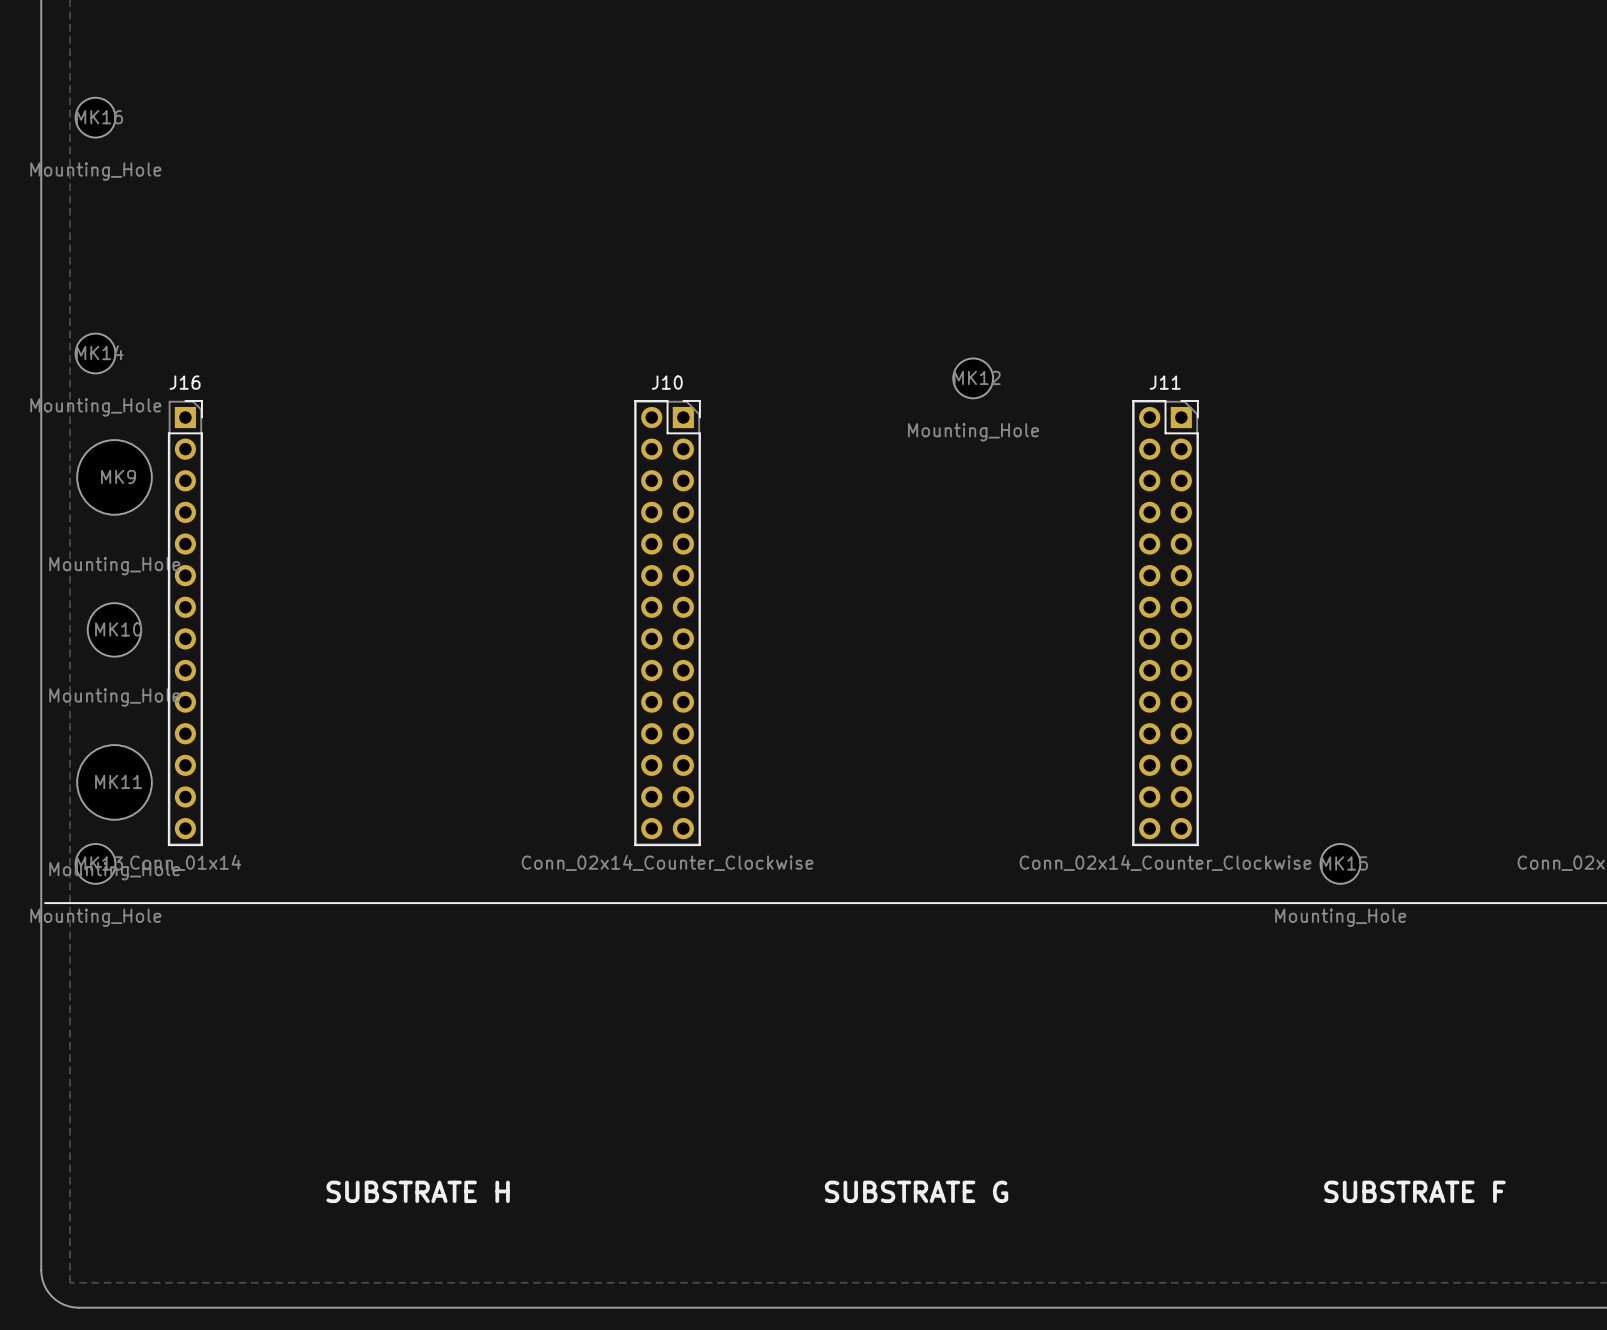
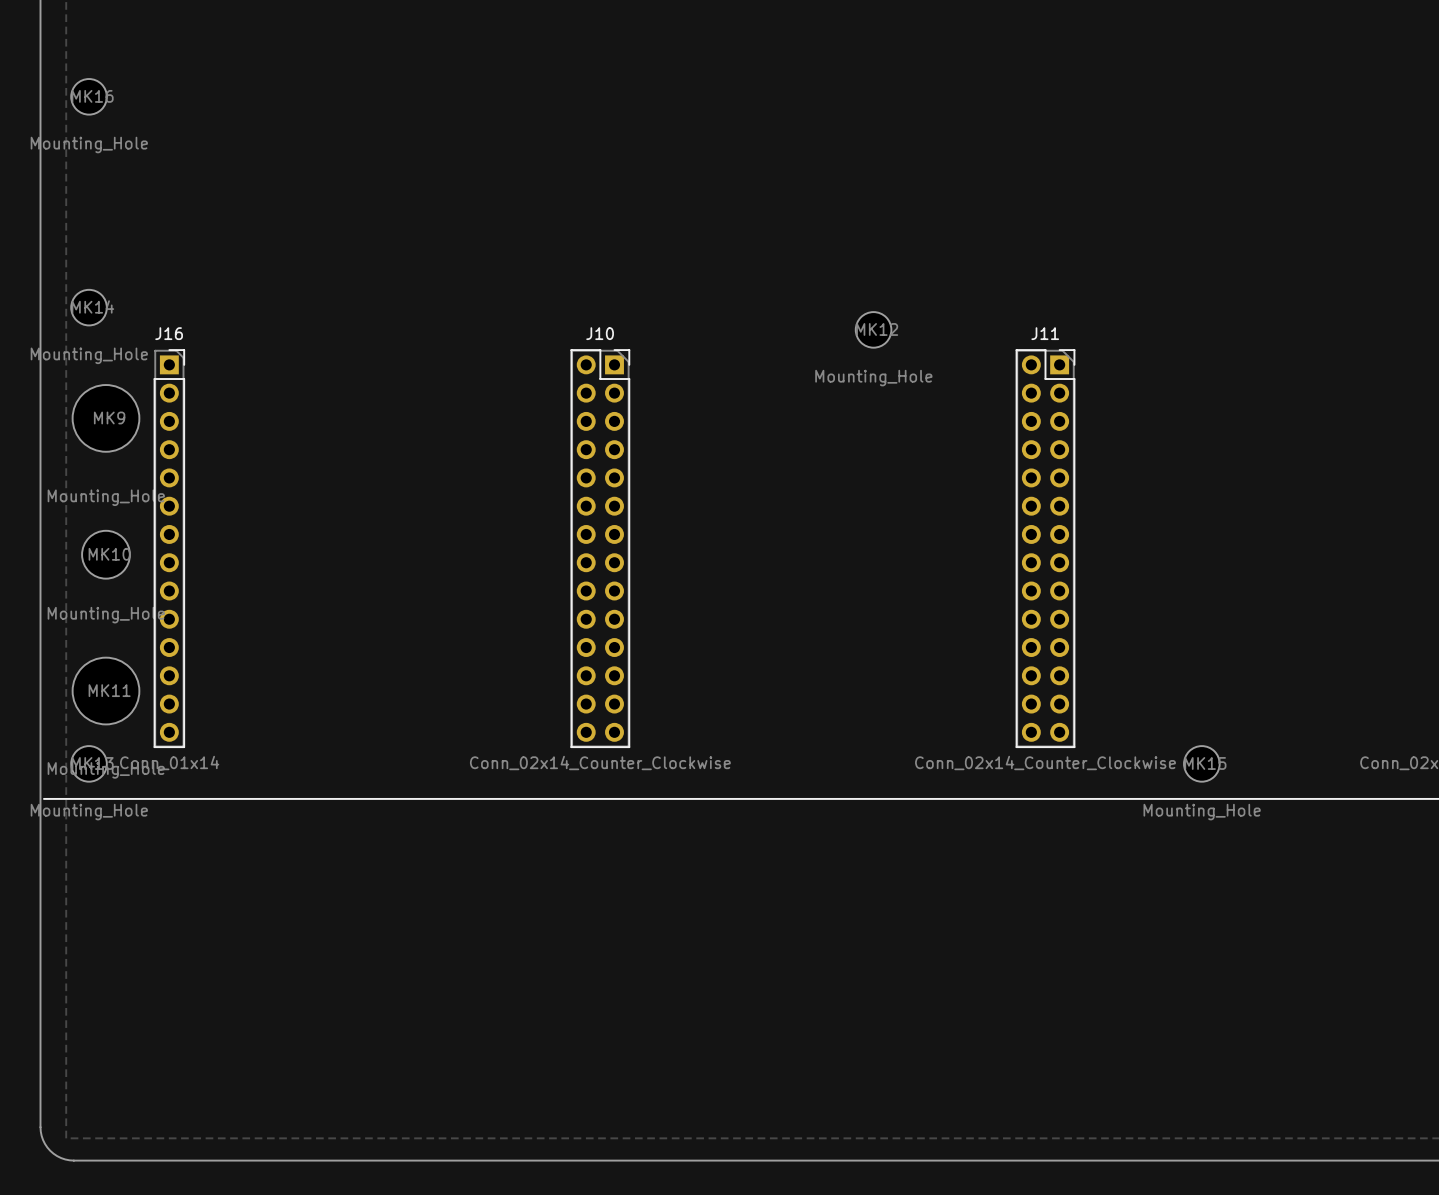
text: SUBSTRATE H (418, 1191) -> none
text: SUBSTRATE G (916, 1191) -> none
text: SUBSTRATE F (1414, 1191) -> none

